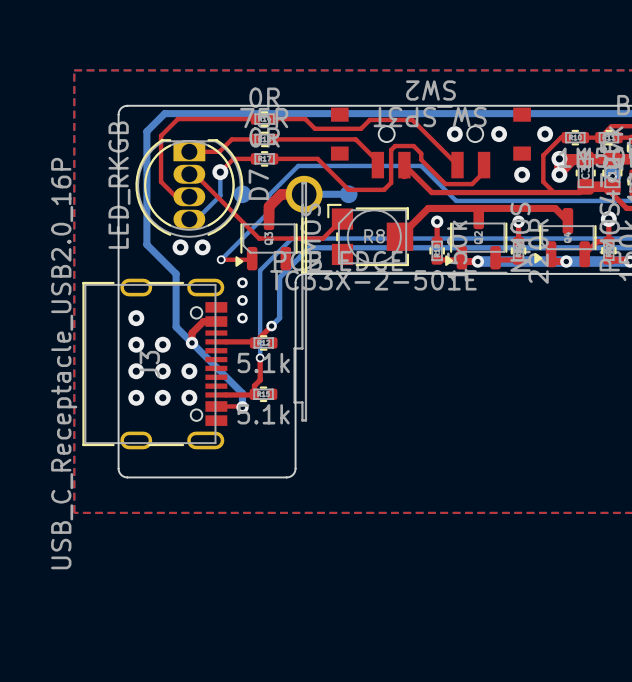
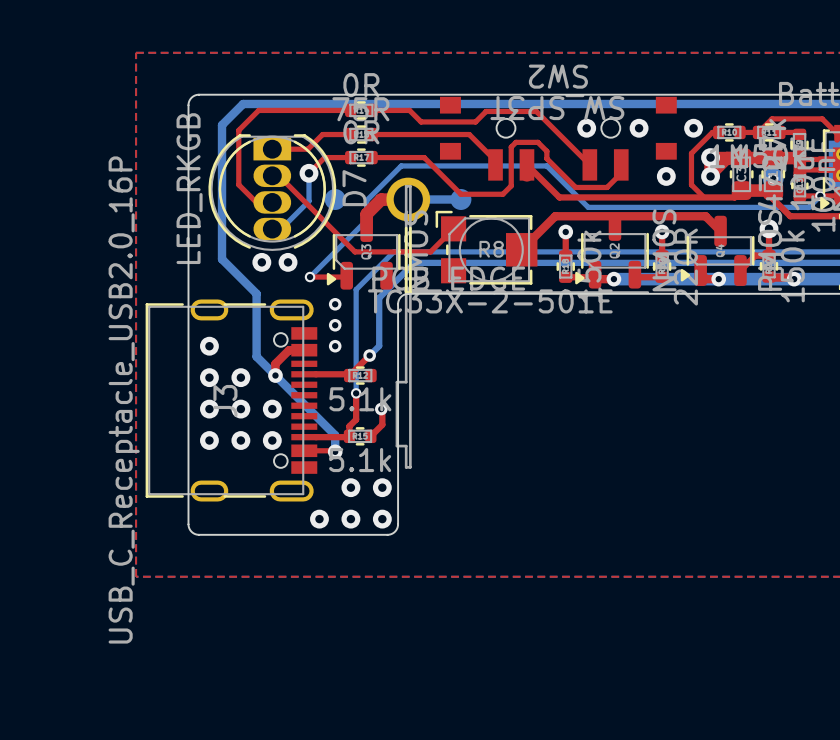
top track: none -> (381, 409) (382, 424) (370, 436)
via: none -> (381, 409)
via: none -> (350, 487)
via: none -> (382, 487)
via: none -> (319, 519)
via: none -> (350, 519)
via: none -> (382, 519)

